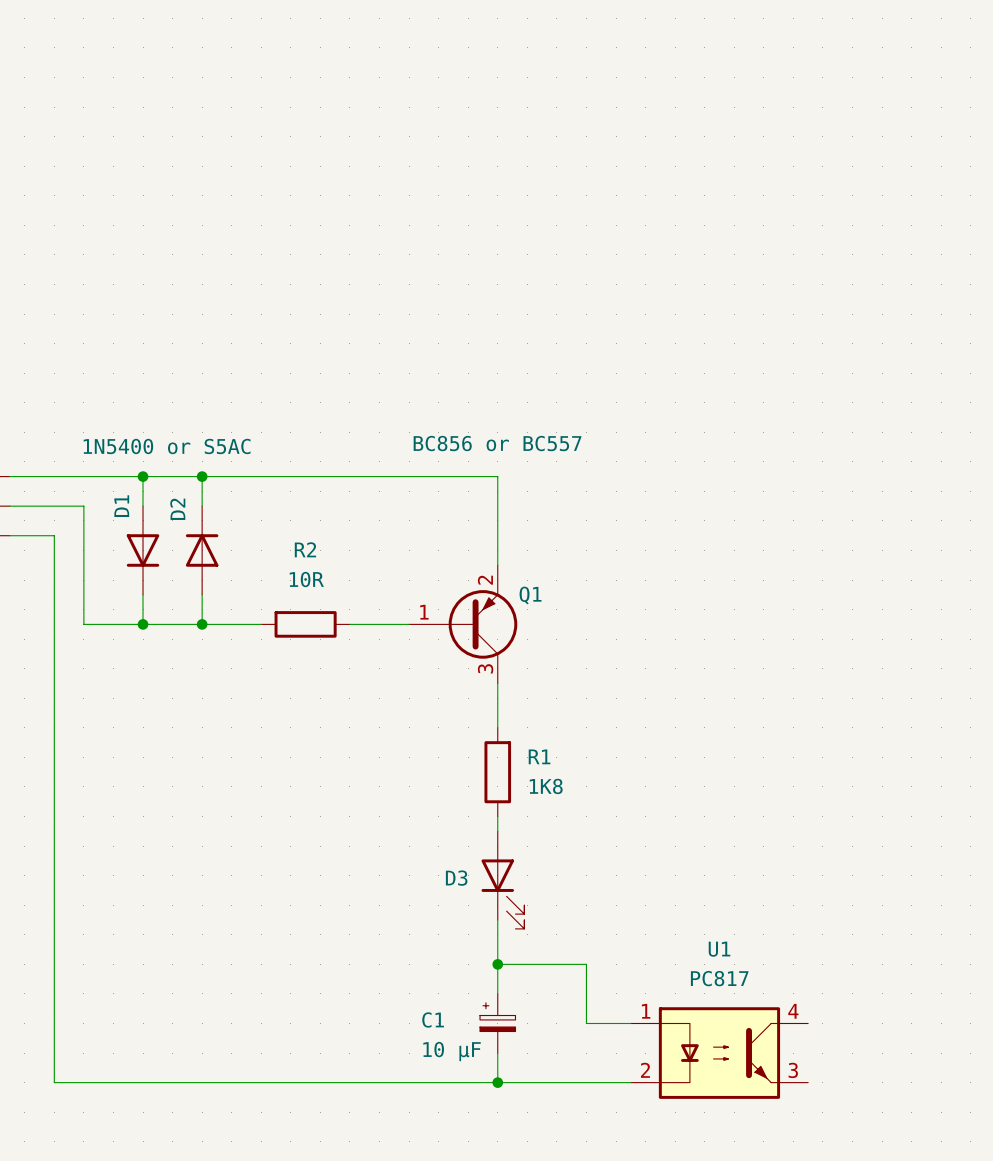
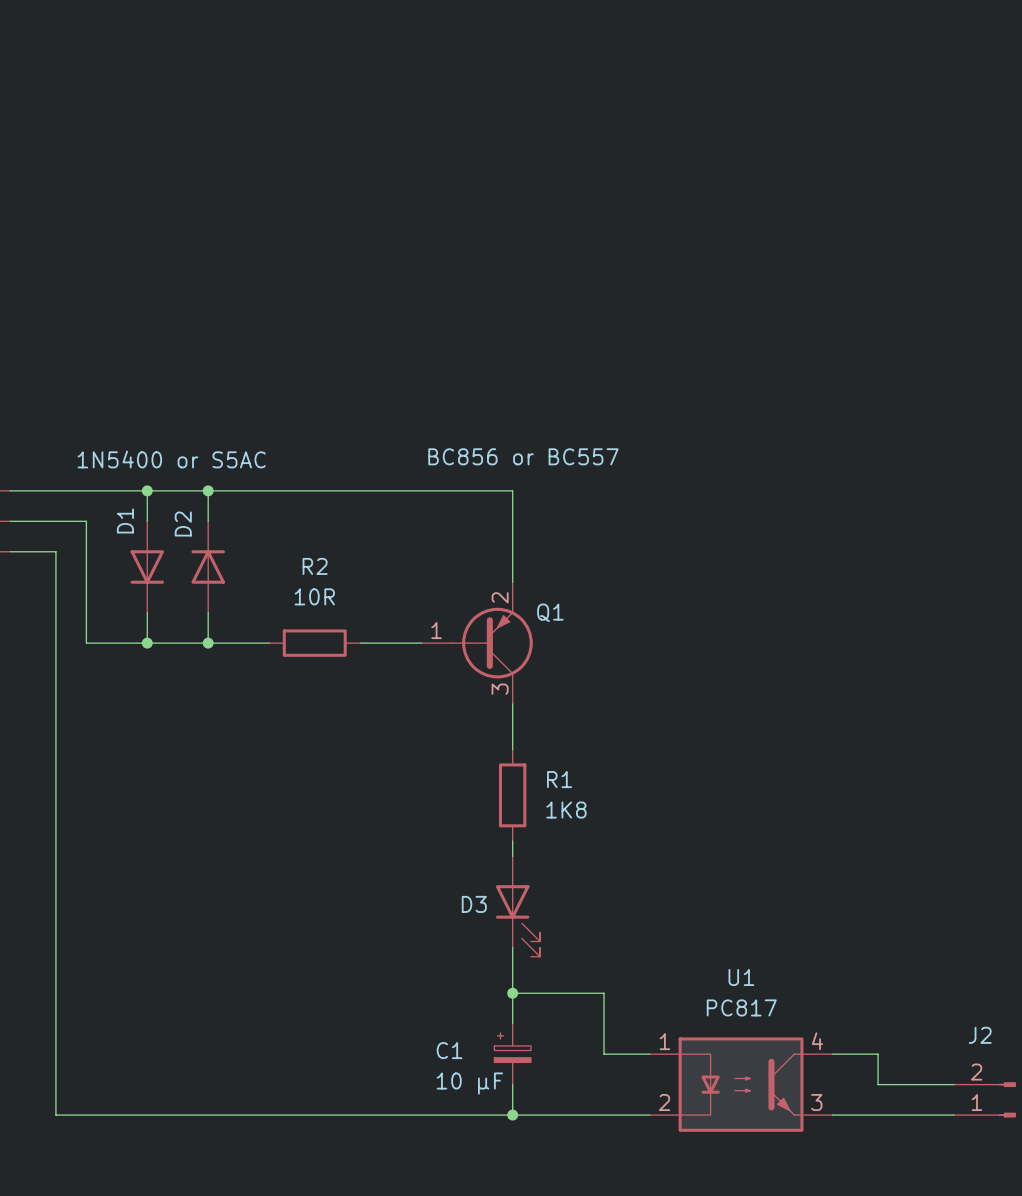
wire: none -> (832, 1054) (878, 1054) (878, 1084) (954, 1084)
J2: none -> (985, 1099)
wire: none -> (832, 1115) (954, 1115)

